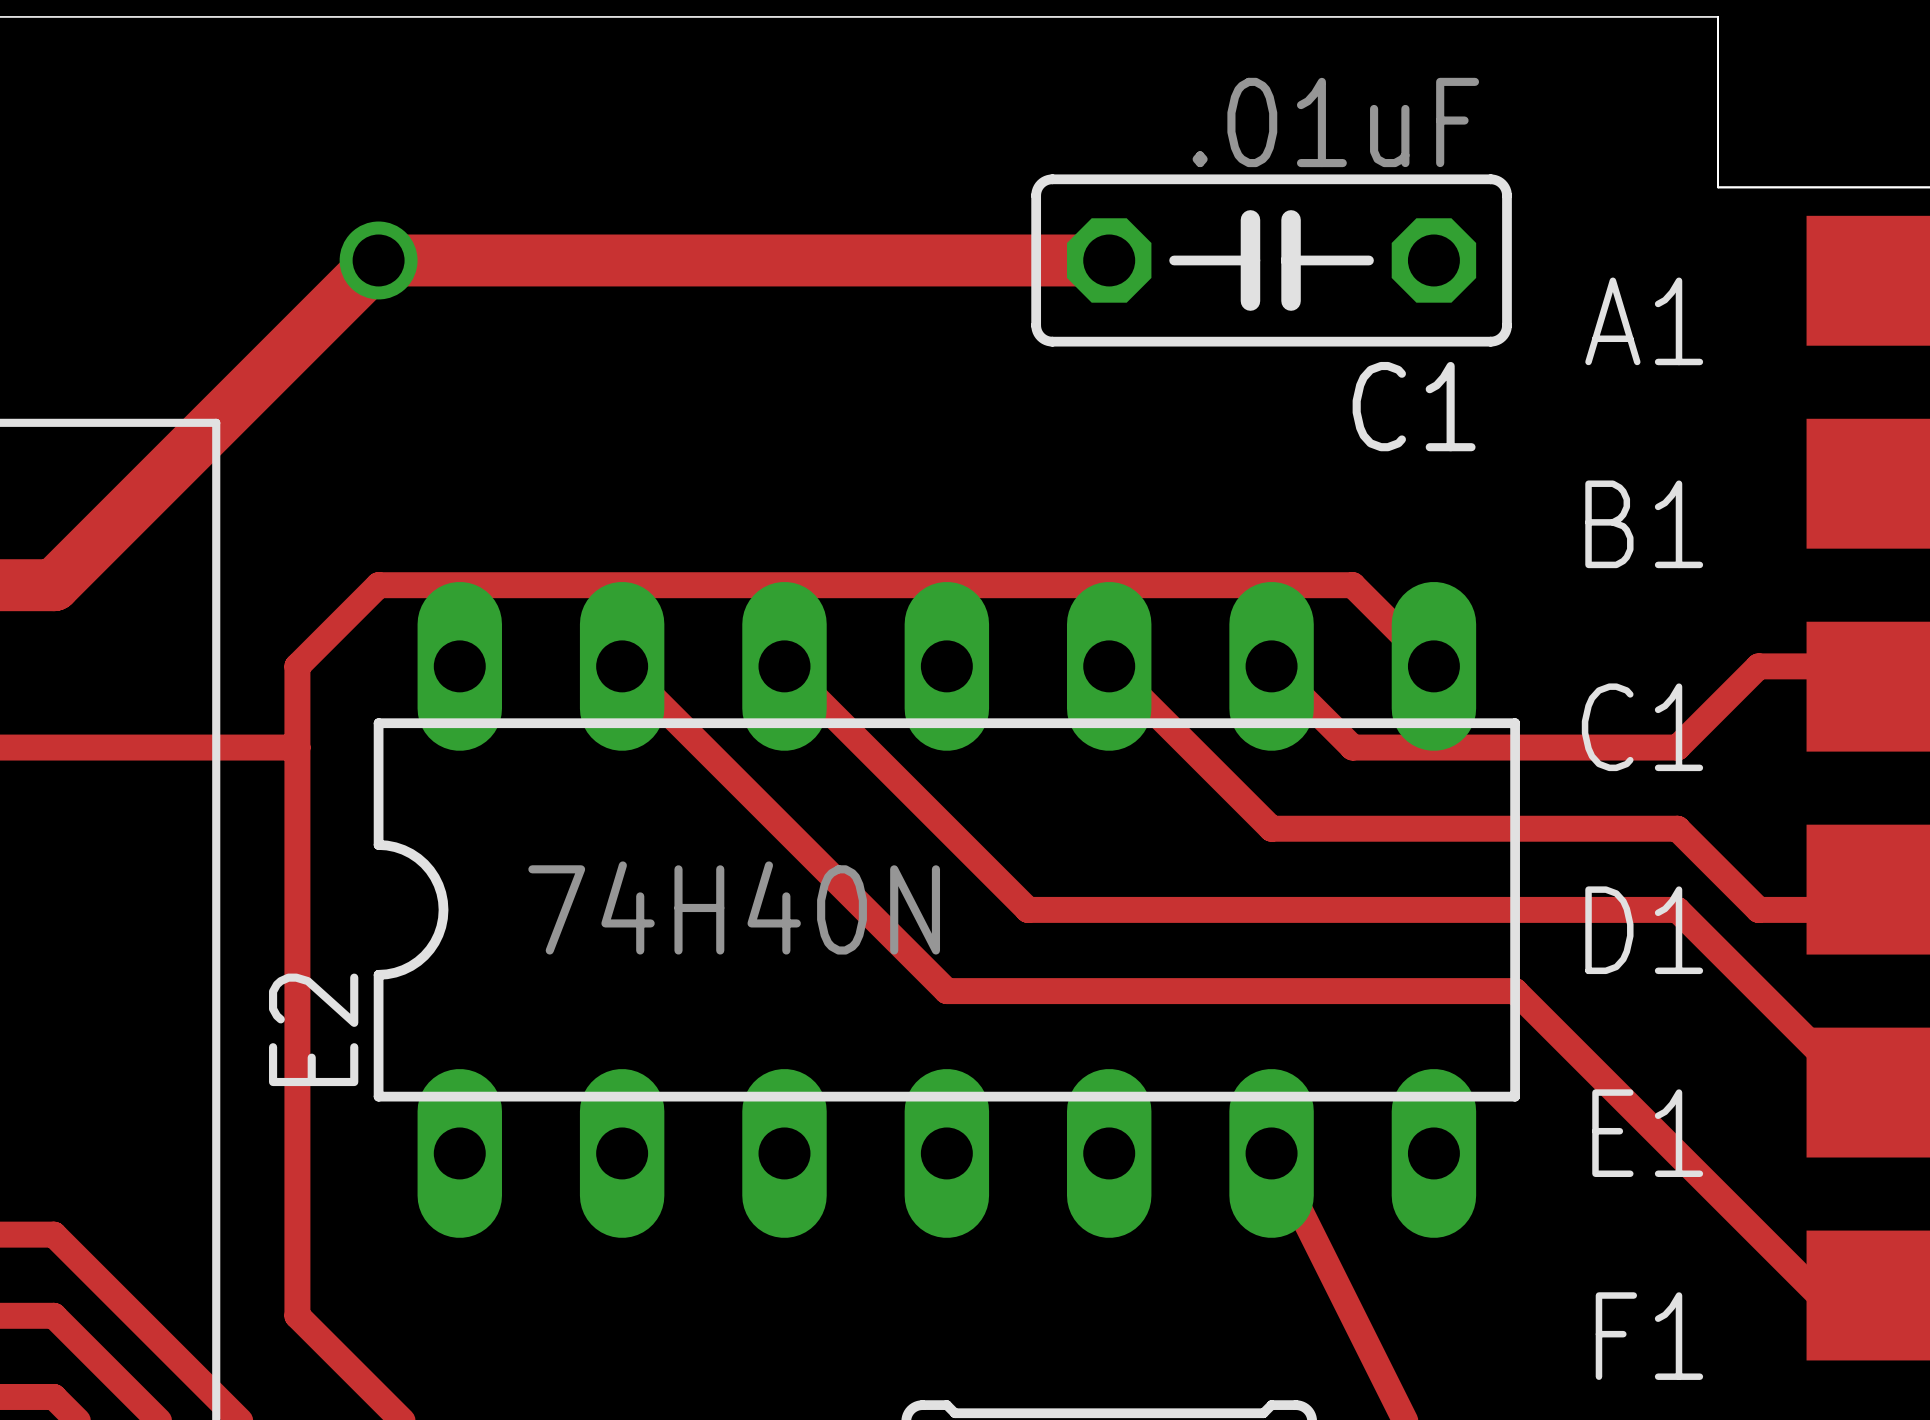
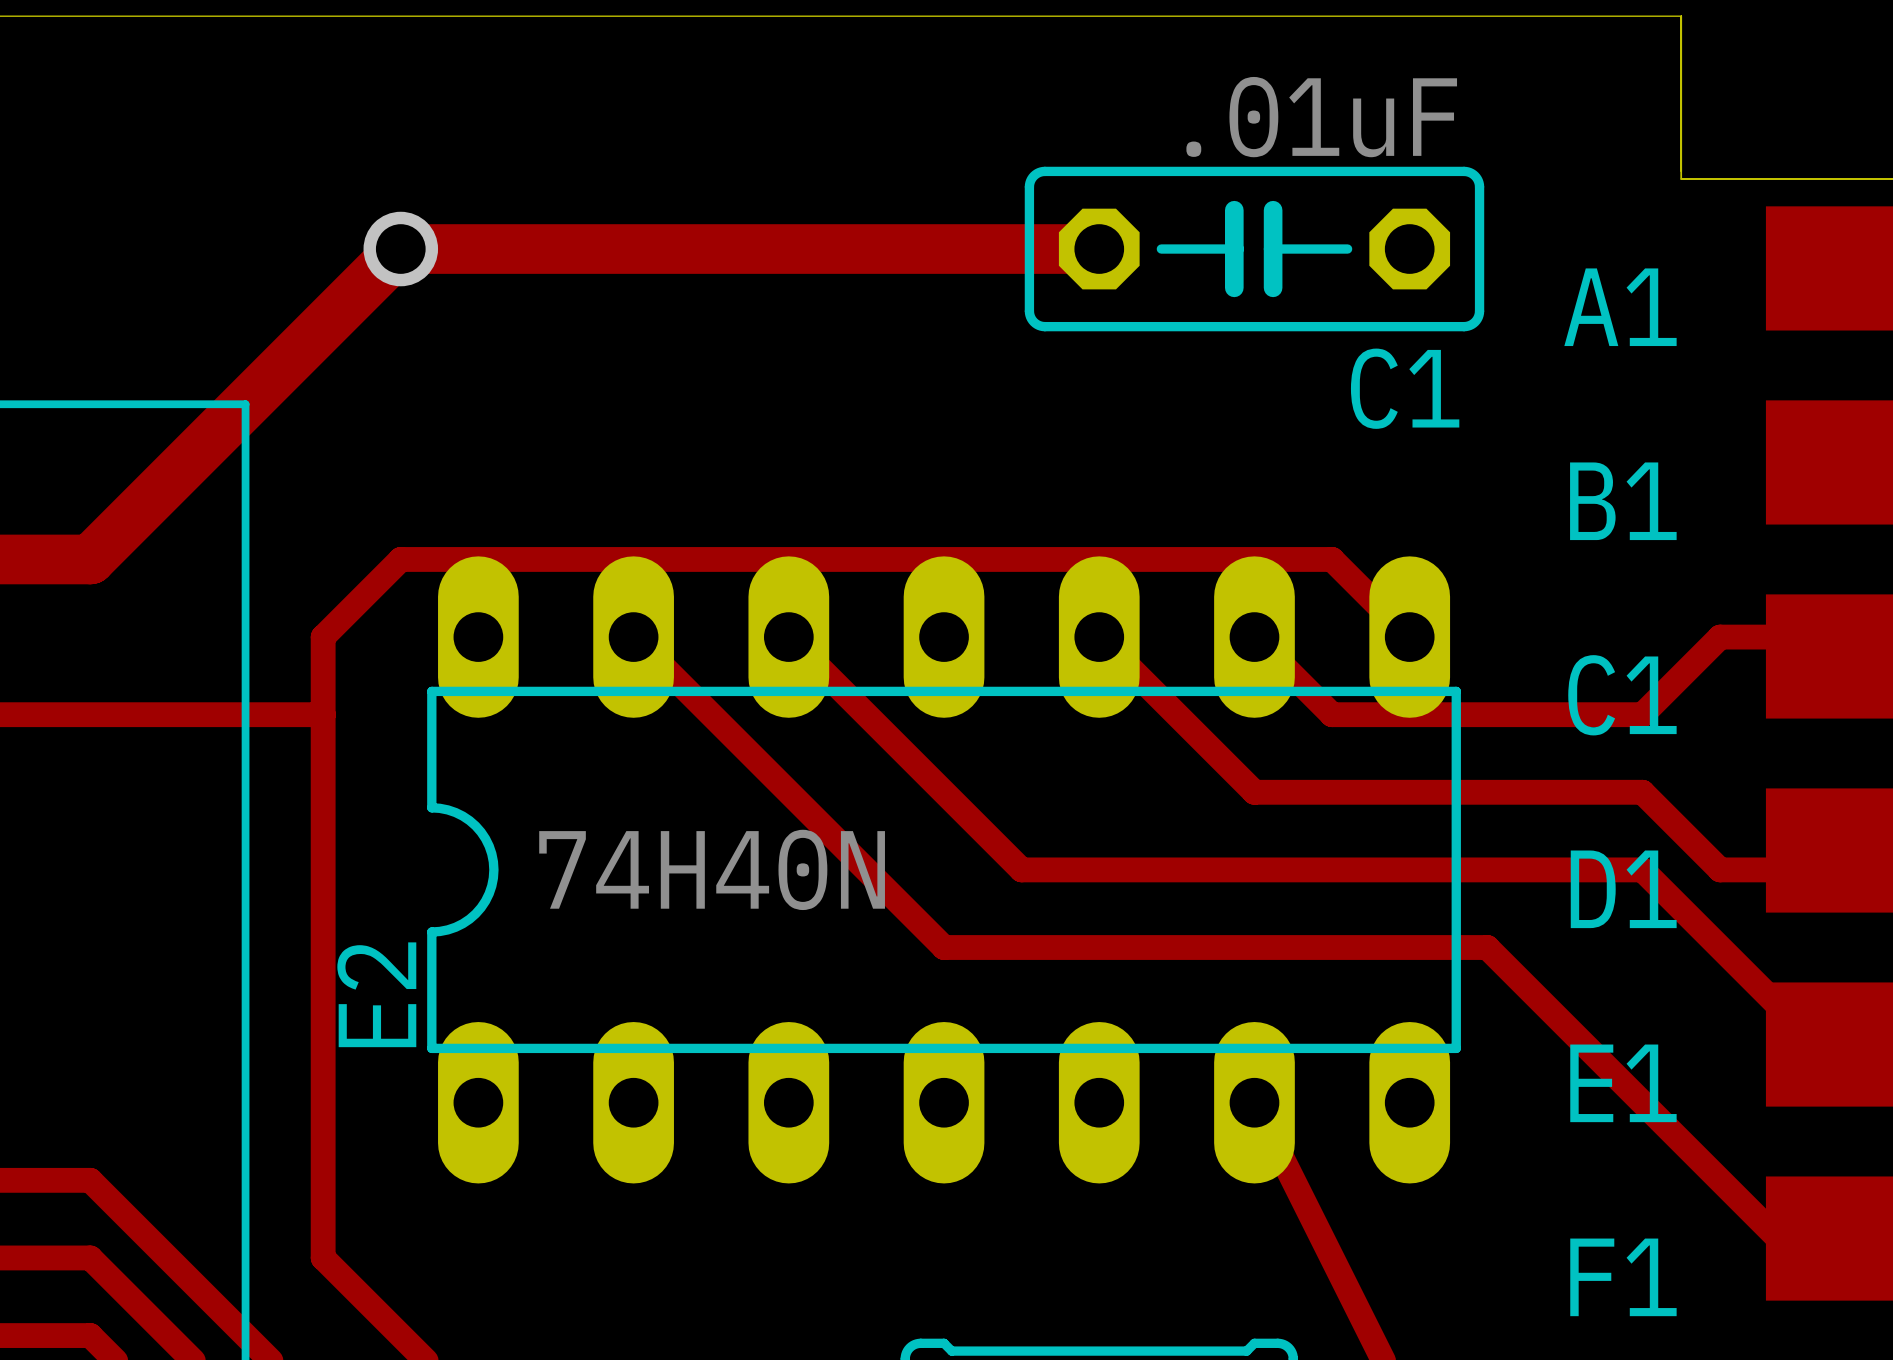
E2 footprint: [373, 581, 1520, 1238] -> [427, 556, 1461, 1184]
E2 name position: E2 (313, 1029) -> E2 (376, 994)

